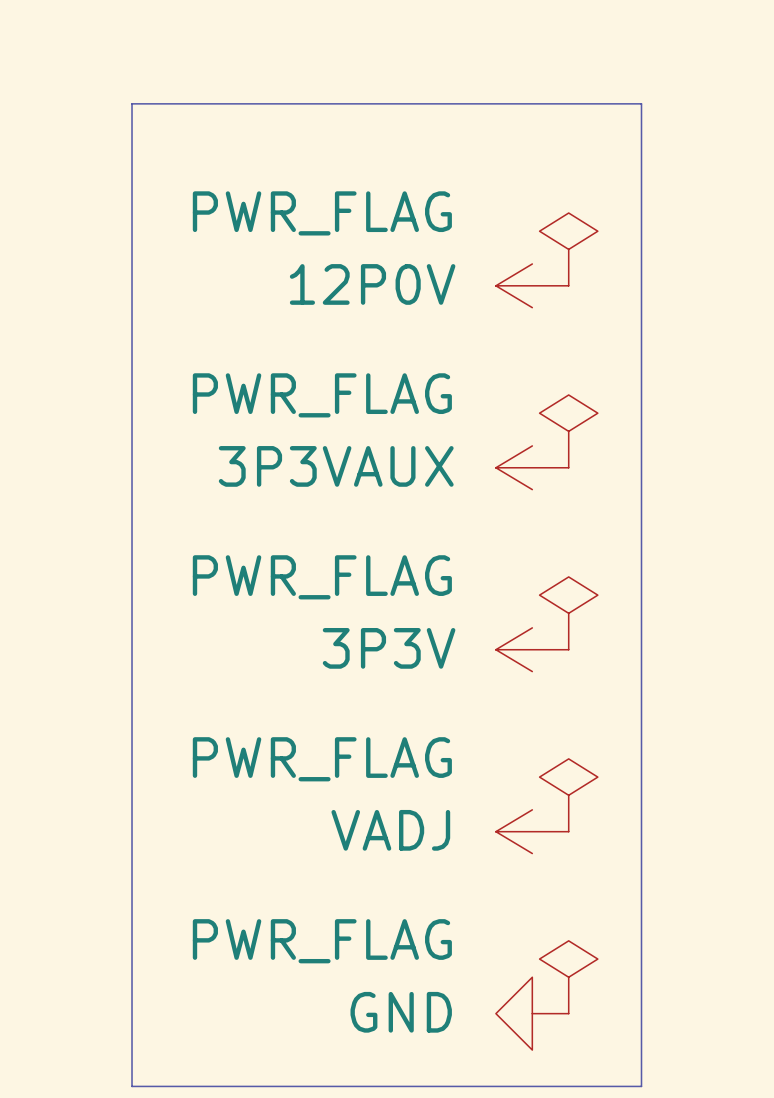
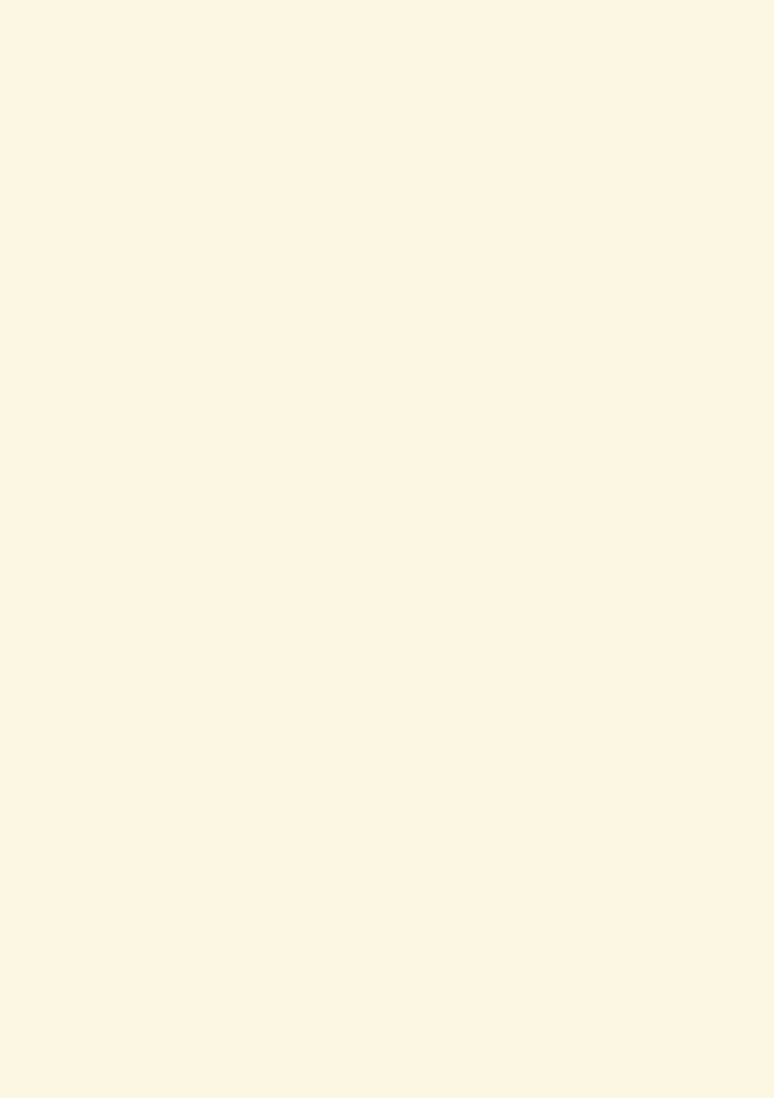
line: (132, 103) (132, 1086) (641, 1086) (641, 103) (132, 103) -> none
power symbol: PWR_FLAG (568, 249) -> none
power symbol: 12P0V (532, 285) -> none
power symbol: PWR_FLAG (568, 431) -> none
power symbol: 3P3VAUX (532, 467) -> none
power symbol: PWR_FLAG (568, 613) -> none
power symbol: 3P3V (532, 649) -> none
power symbol: PWR_FLAG (568, 795) -> none
power symbol: VADJ (532, 831) -> none
power symbol: PWR_FLAG (568, 977) -> none
power symbol: GND (532, 1013) -> none

